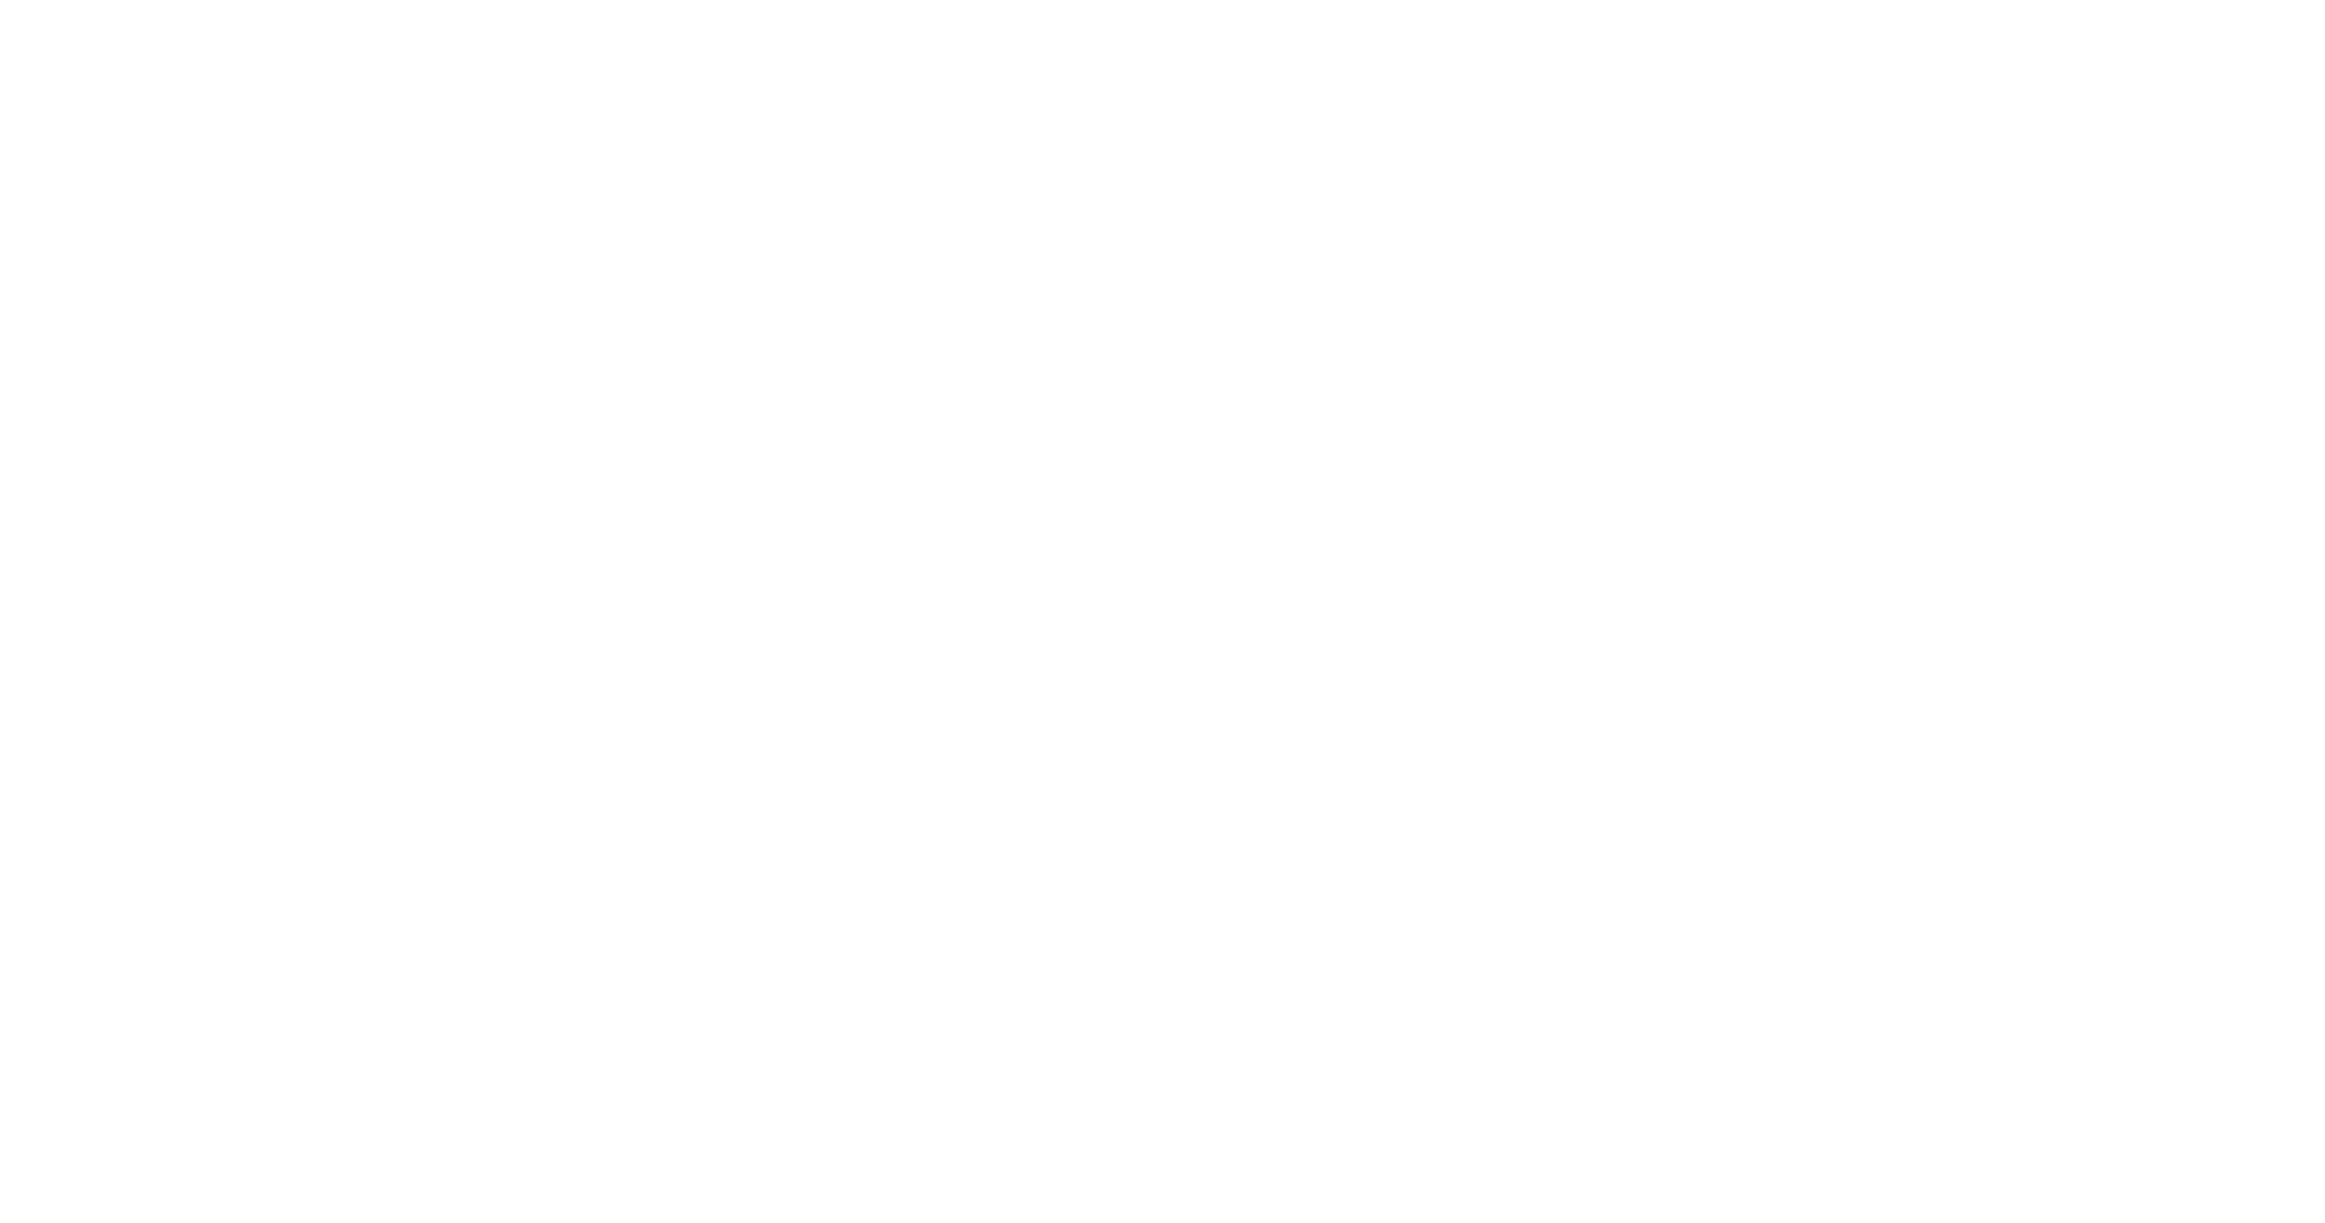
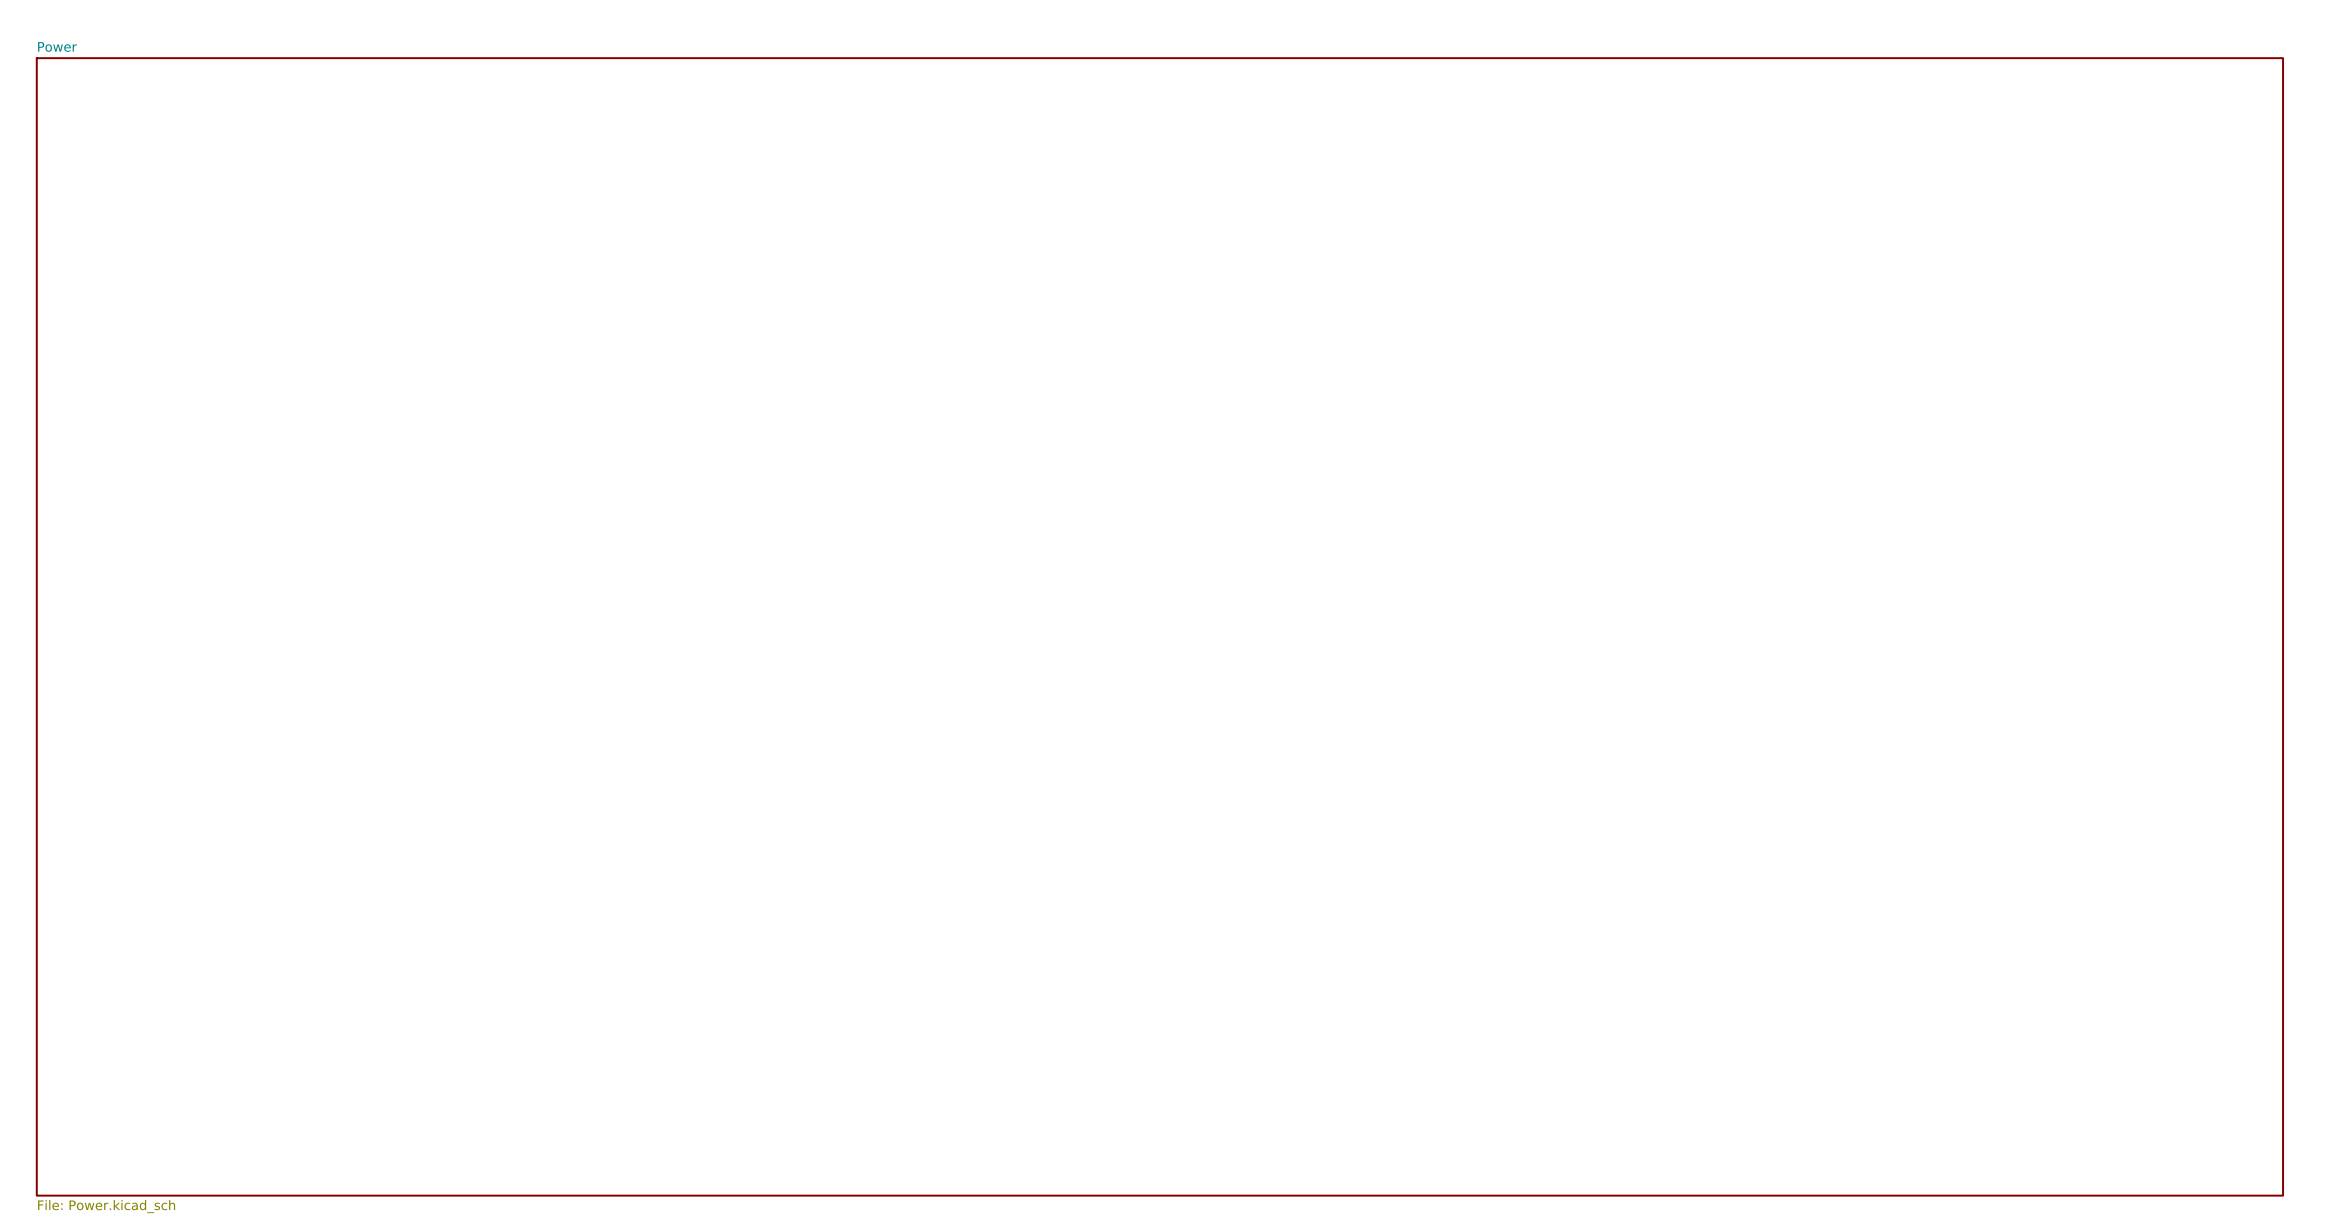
sheet Power: none -> File: Power.kicad_sch (1159, 626)

